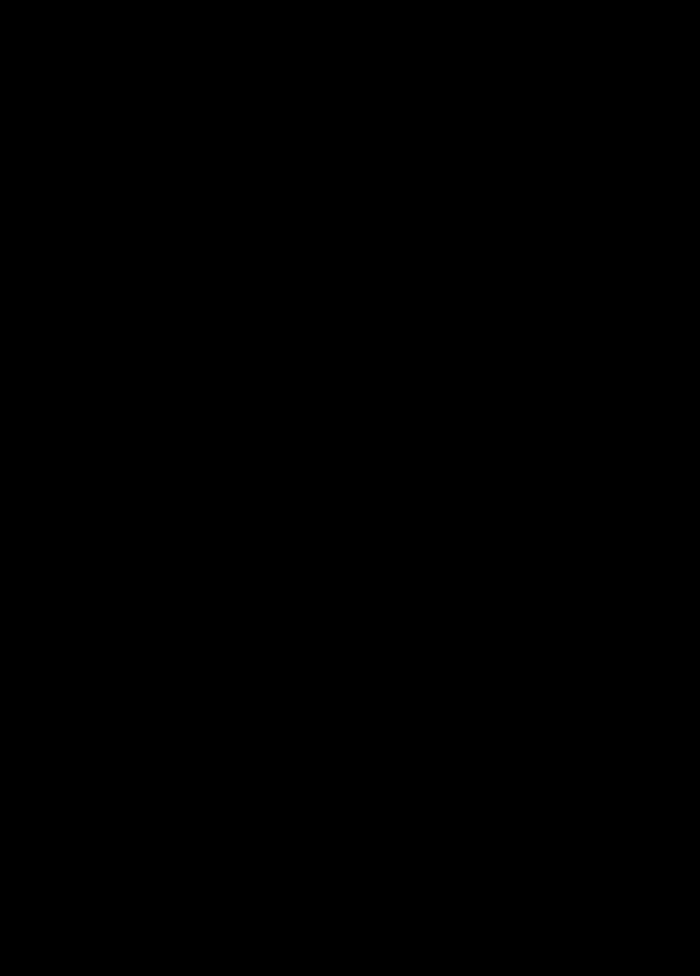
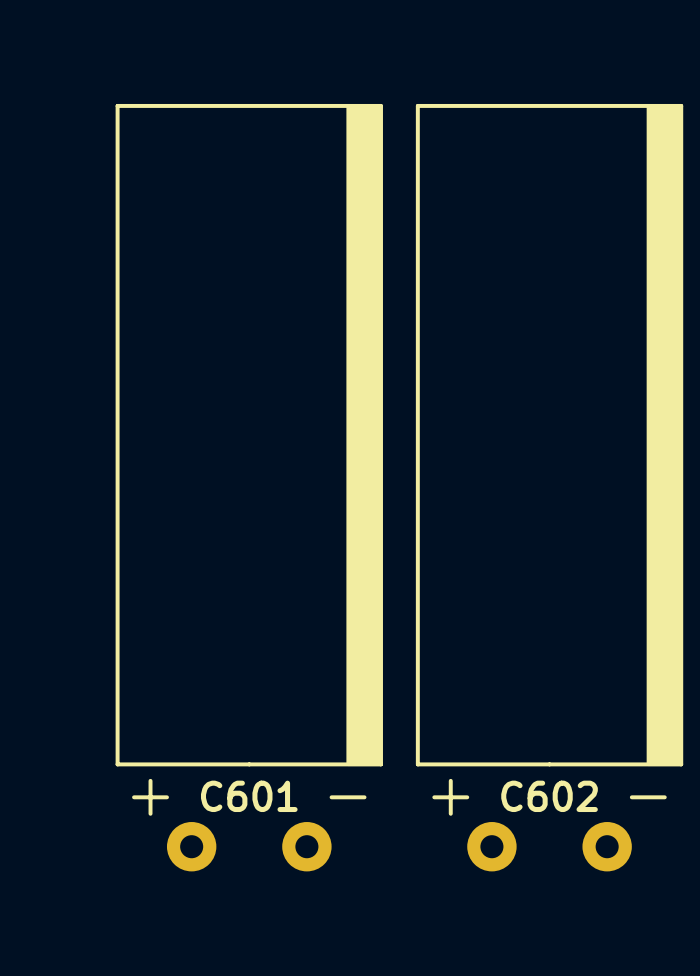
C601: none -> (249, 487)
C602: none -> (549, 487)

